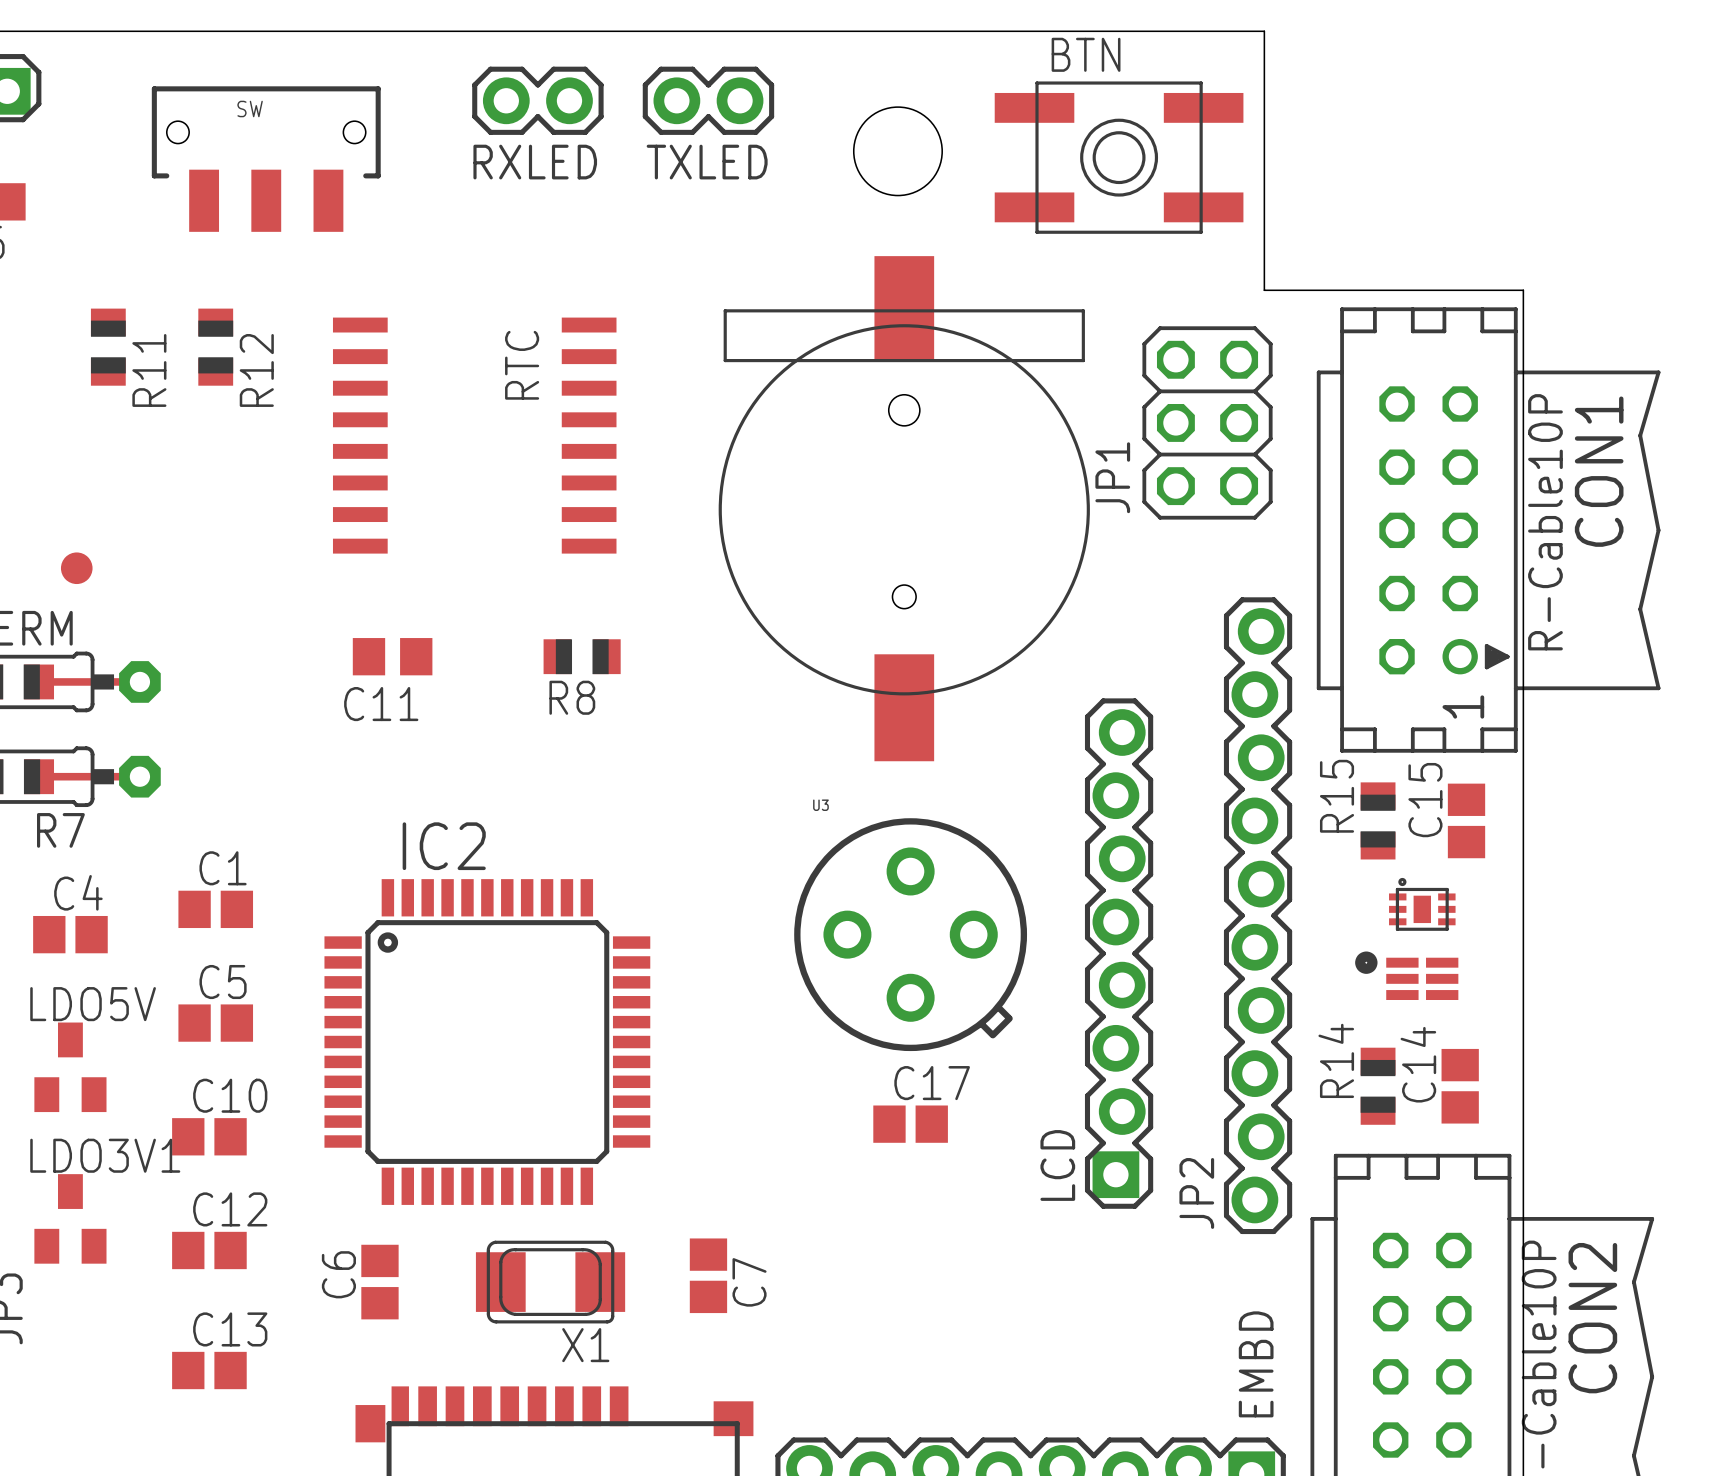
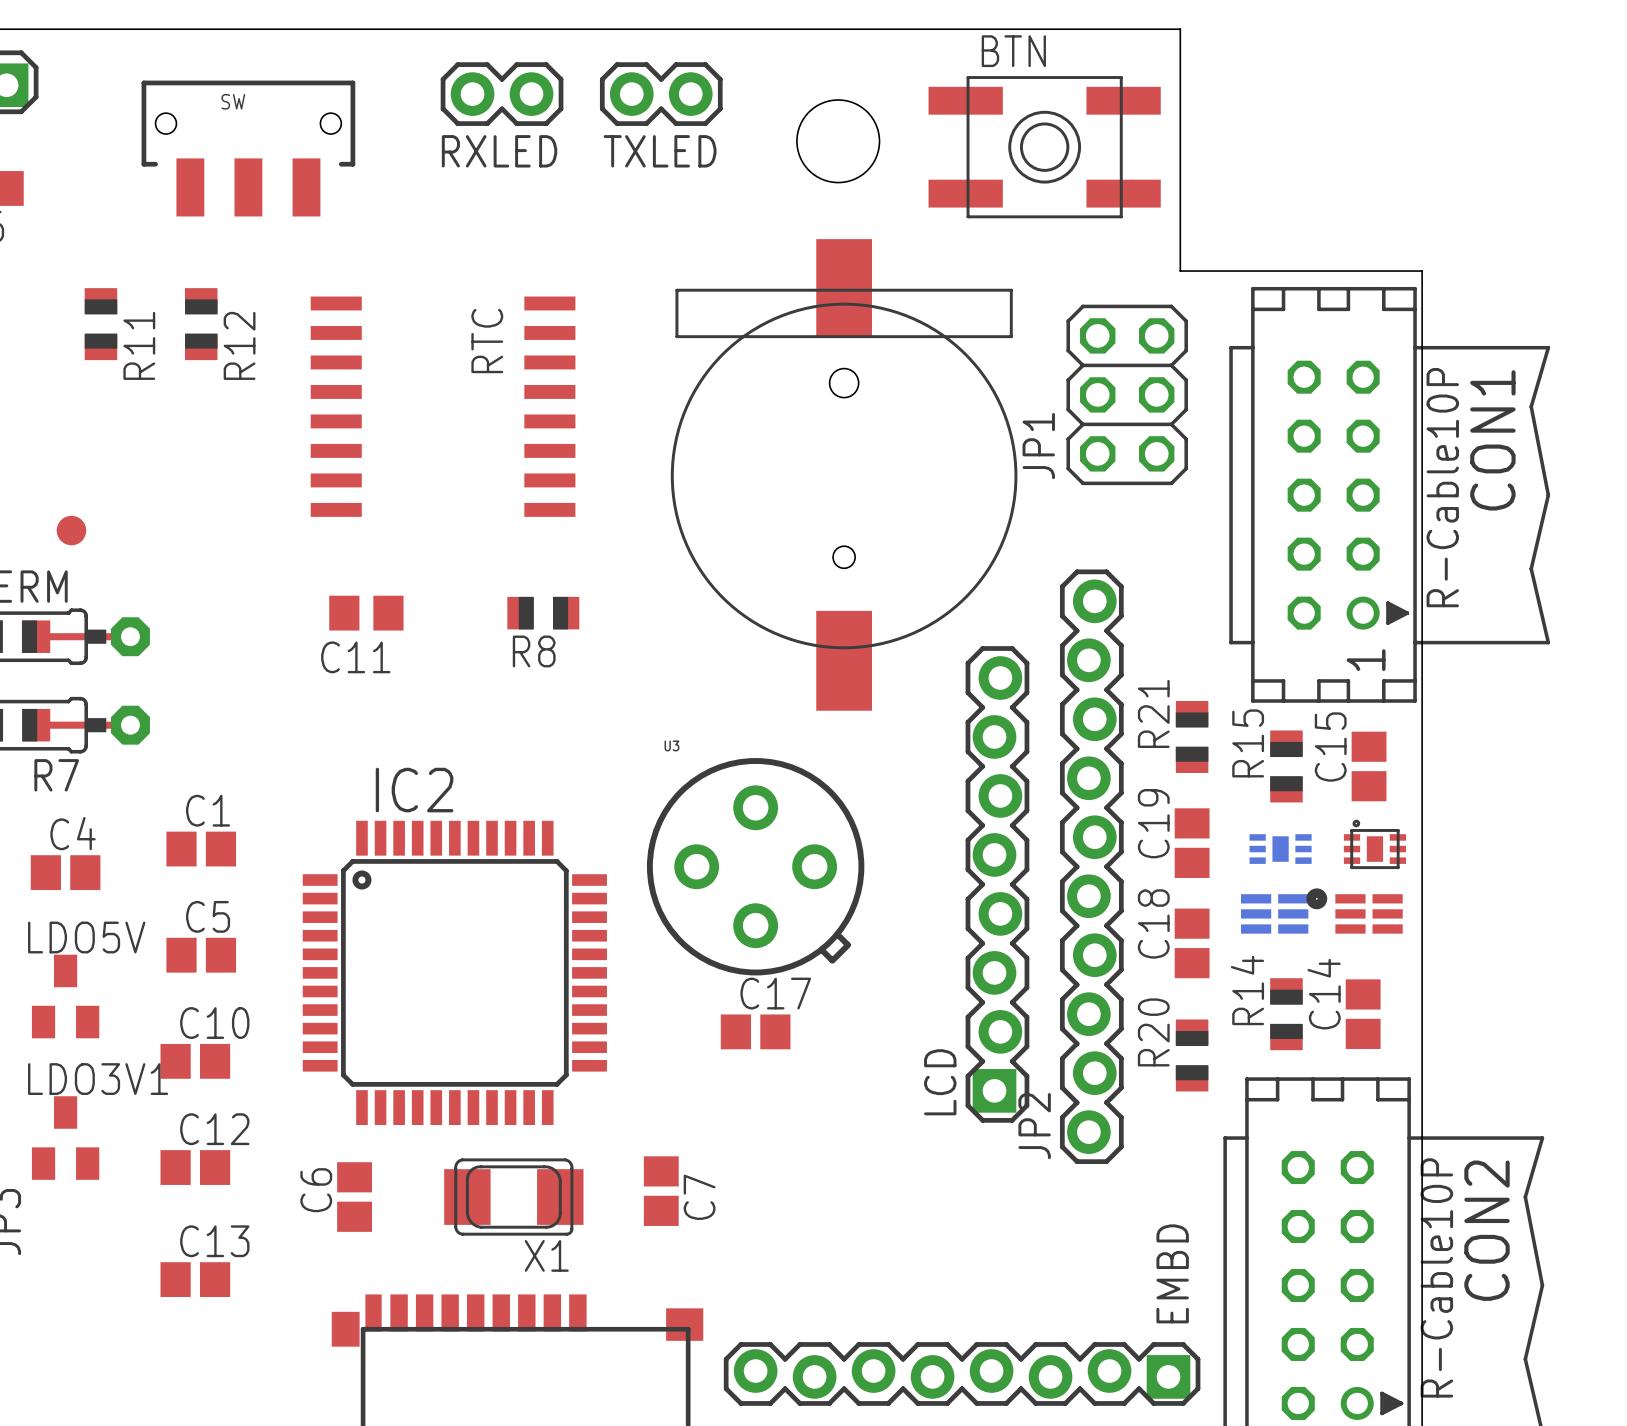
R21: none -> (1192, 736)
C19: none -> (1192, 843)
part position: (1422, 904) -> (1374, 844)
part: none -> (1280, 849)
JP2 position: (1258, 915) -> (1091, 866)
U3 position: (910, 934) -> (755, 866)
LCD position: (1119, 953) -> (997, 884)
part position: (1406, 975) -> (1354, 911)
part: none -> (1274, 913)
C18: none -> (1192, 943)
C17 position: (910, 1124) -> (755, 1031)
R20: none -> (1192, 1055)

